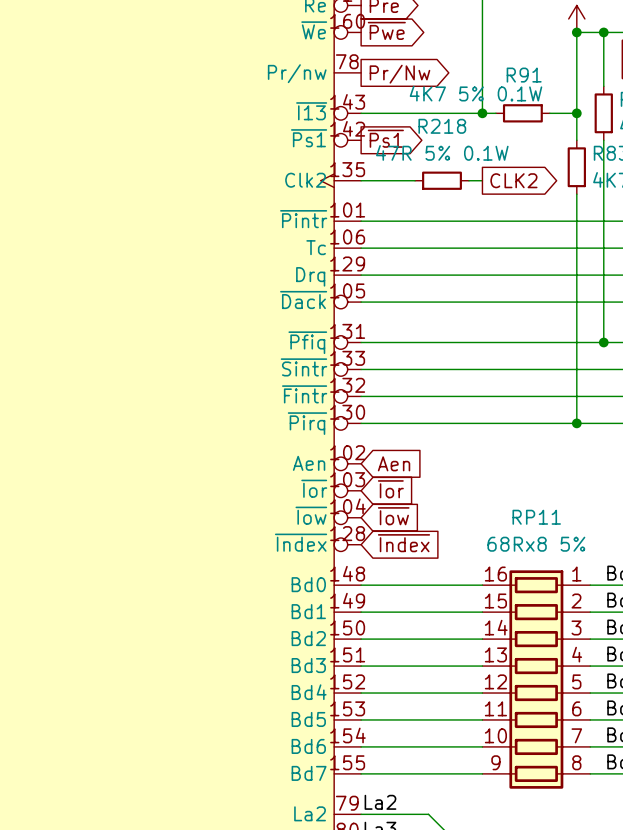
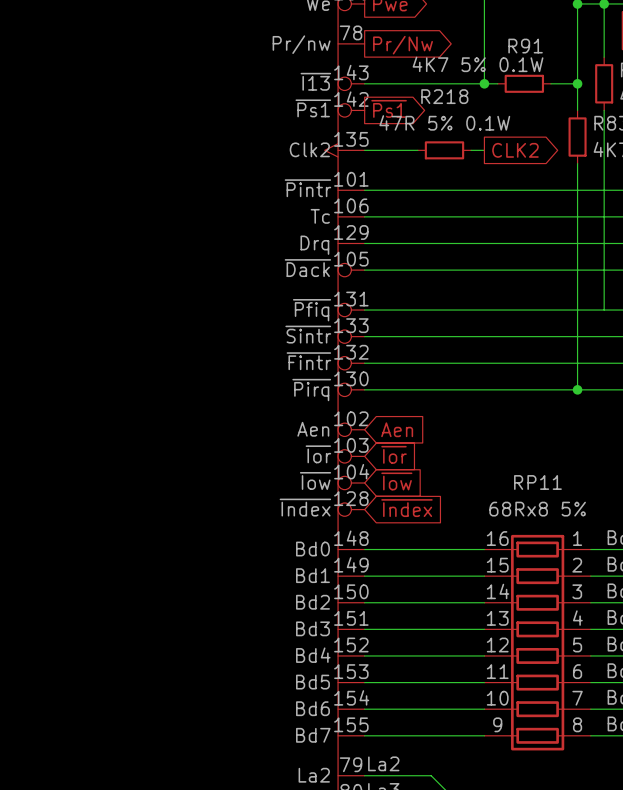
junction: (603, 342) -> none

